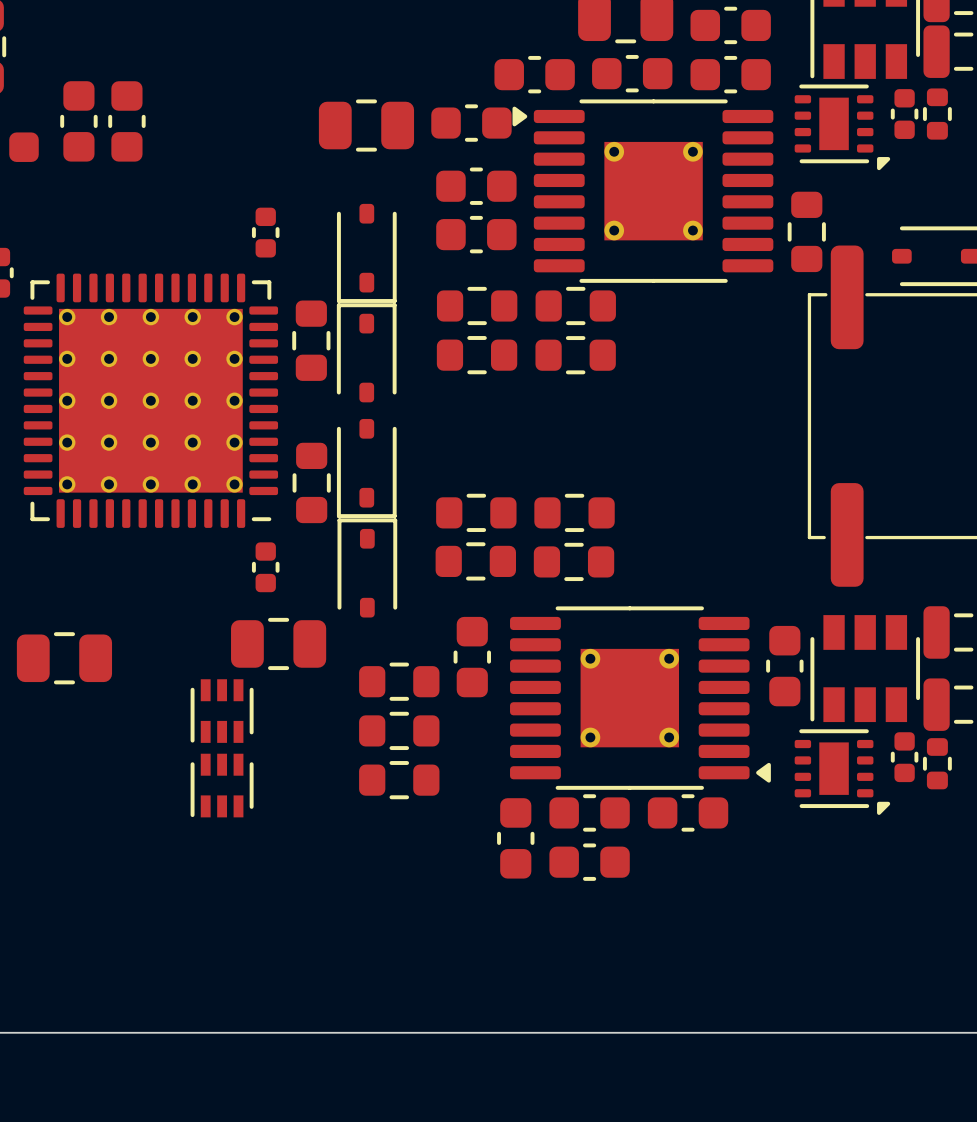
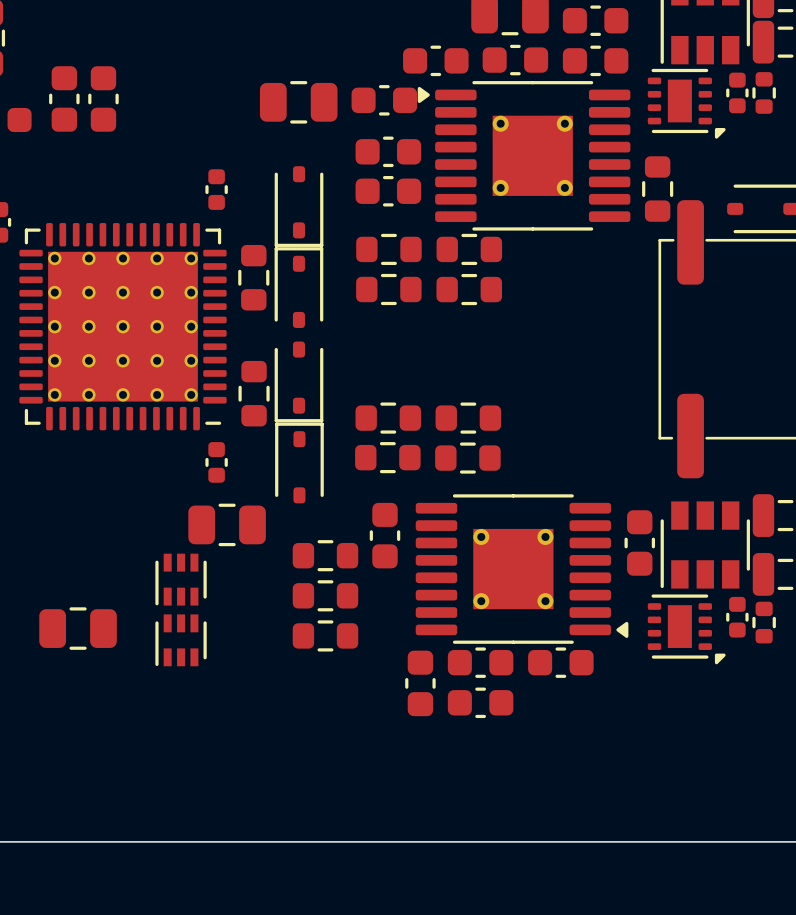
part position: (64, 658) -> (78, 628)

